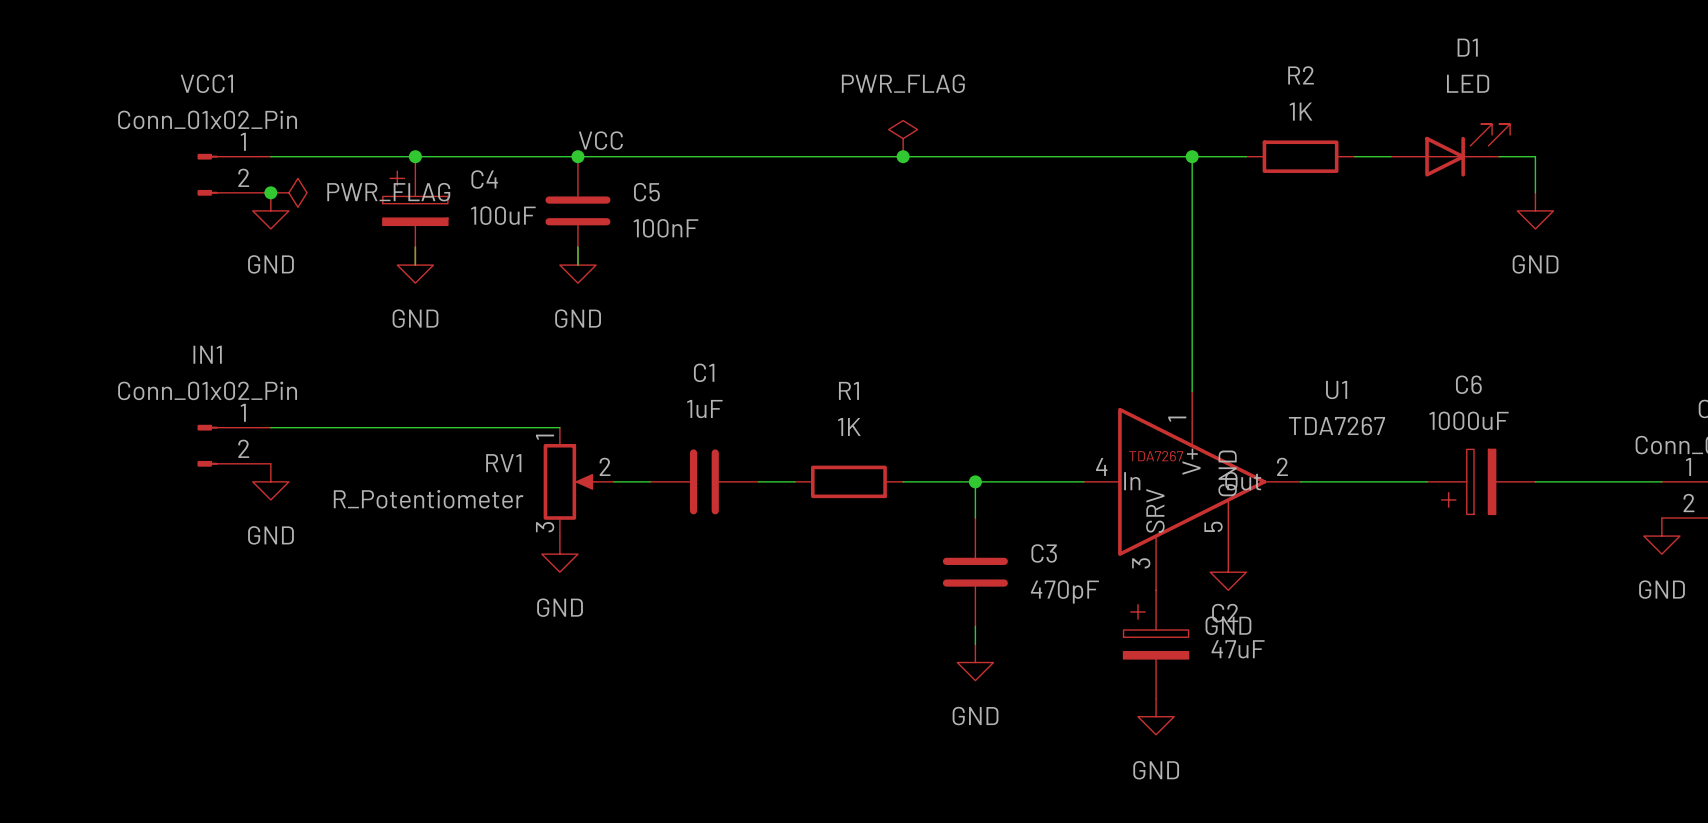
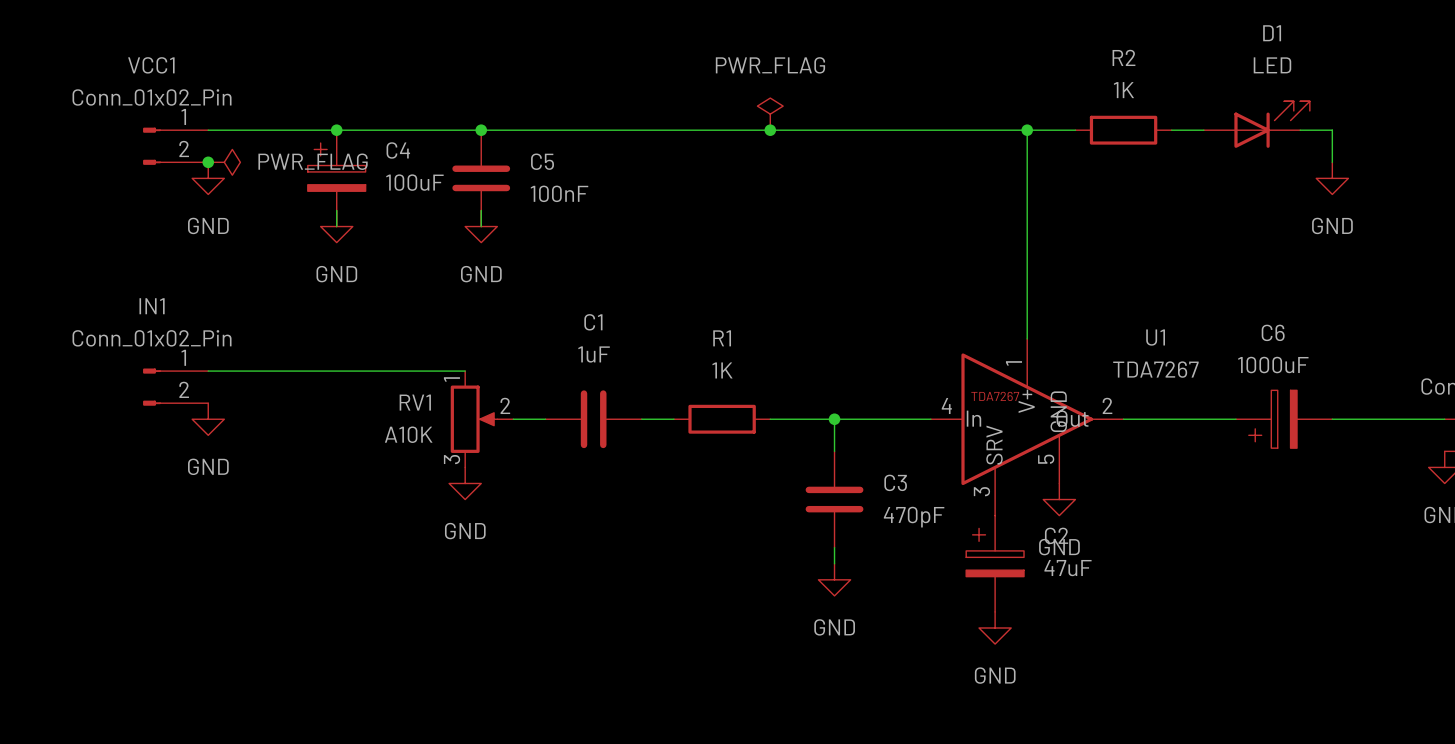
label: VCC (600, 140) -> none
RV1 value: R_Potentiometer (428, 499) -> A10K (408, 434)

